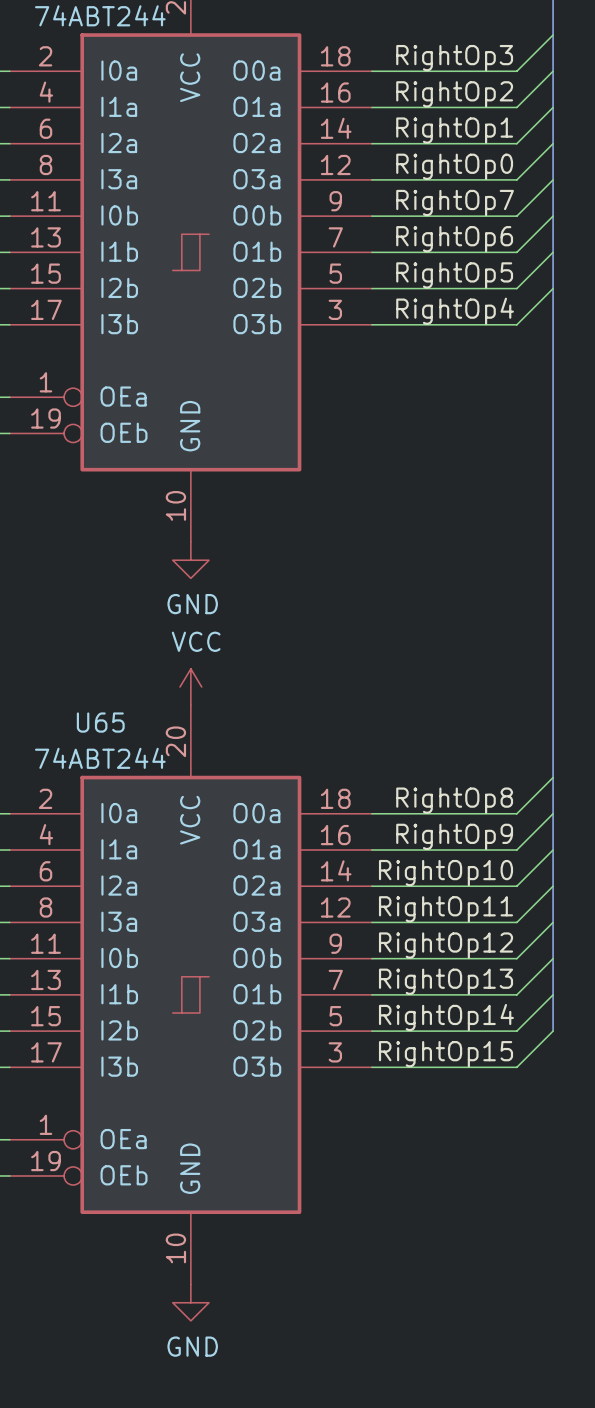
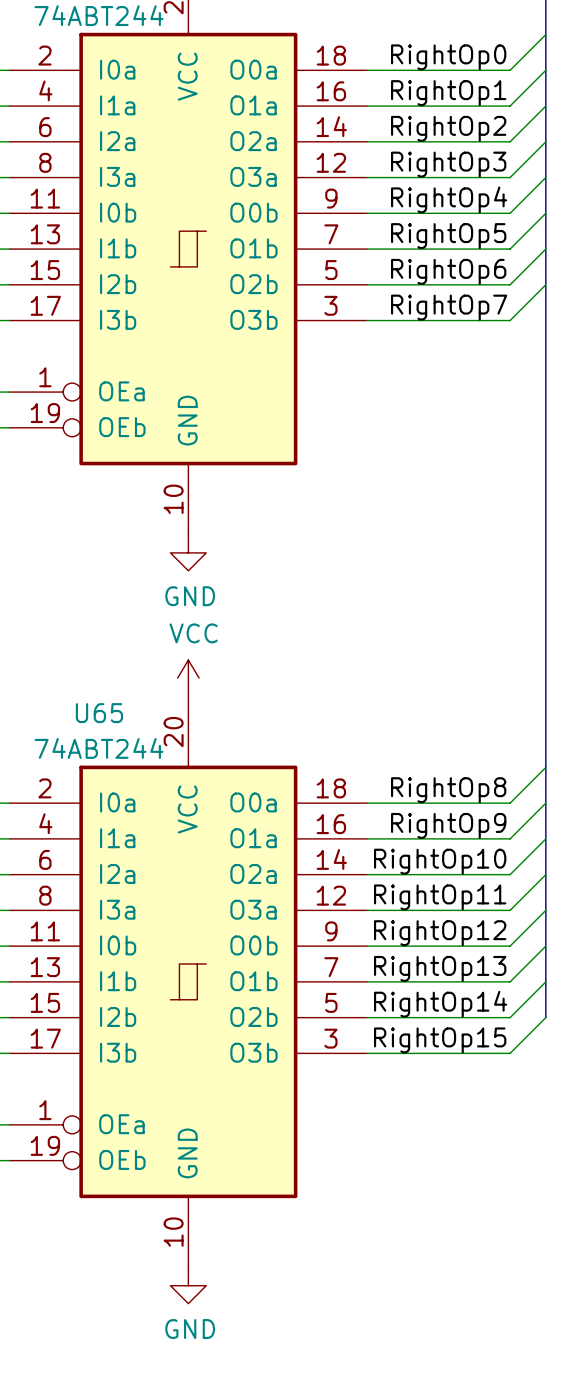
label: RightOp3 (454, 58) -> RightOp0 (448, 57)
label: RightOp2 (454, 94) -> RightOp1 (448, 93)
label: RightOp1 (454, 130) -> RightOp2 (448, 128)
label: RightOp0 (454, 166) -> RightOp3 (448, 164)
label: RightOp7 (455, 203) -> RightOp4 (449, 199)
label: RightOp6 (454, 239) -> RightOp5 (448, 236)
label: RightOp5 (454, 275) -> RightOp6 (448, 271)
label: RightOp4 (455, 311) -> RightOp7 (449, 307)

